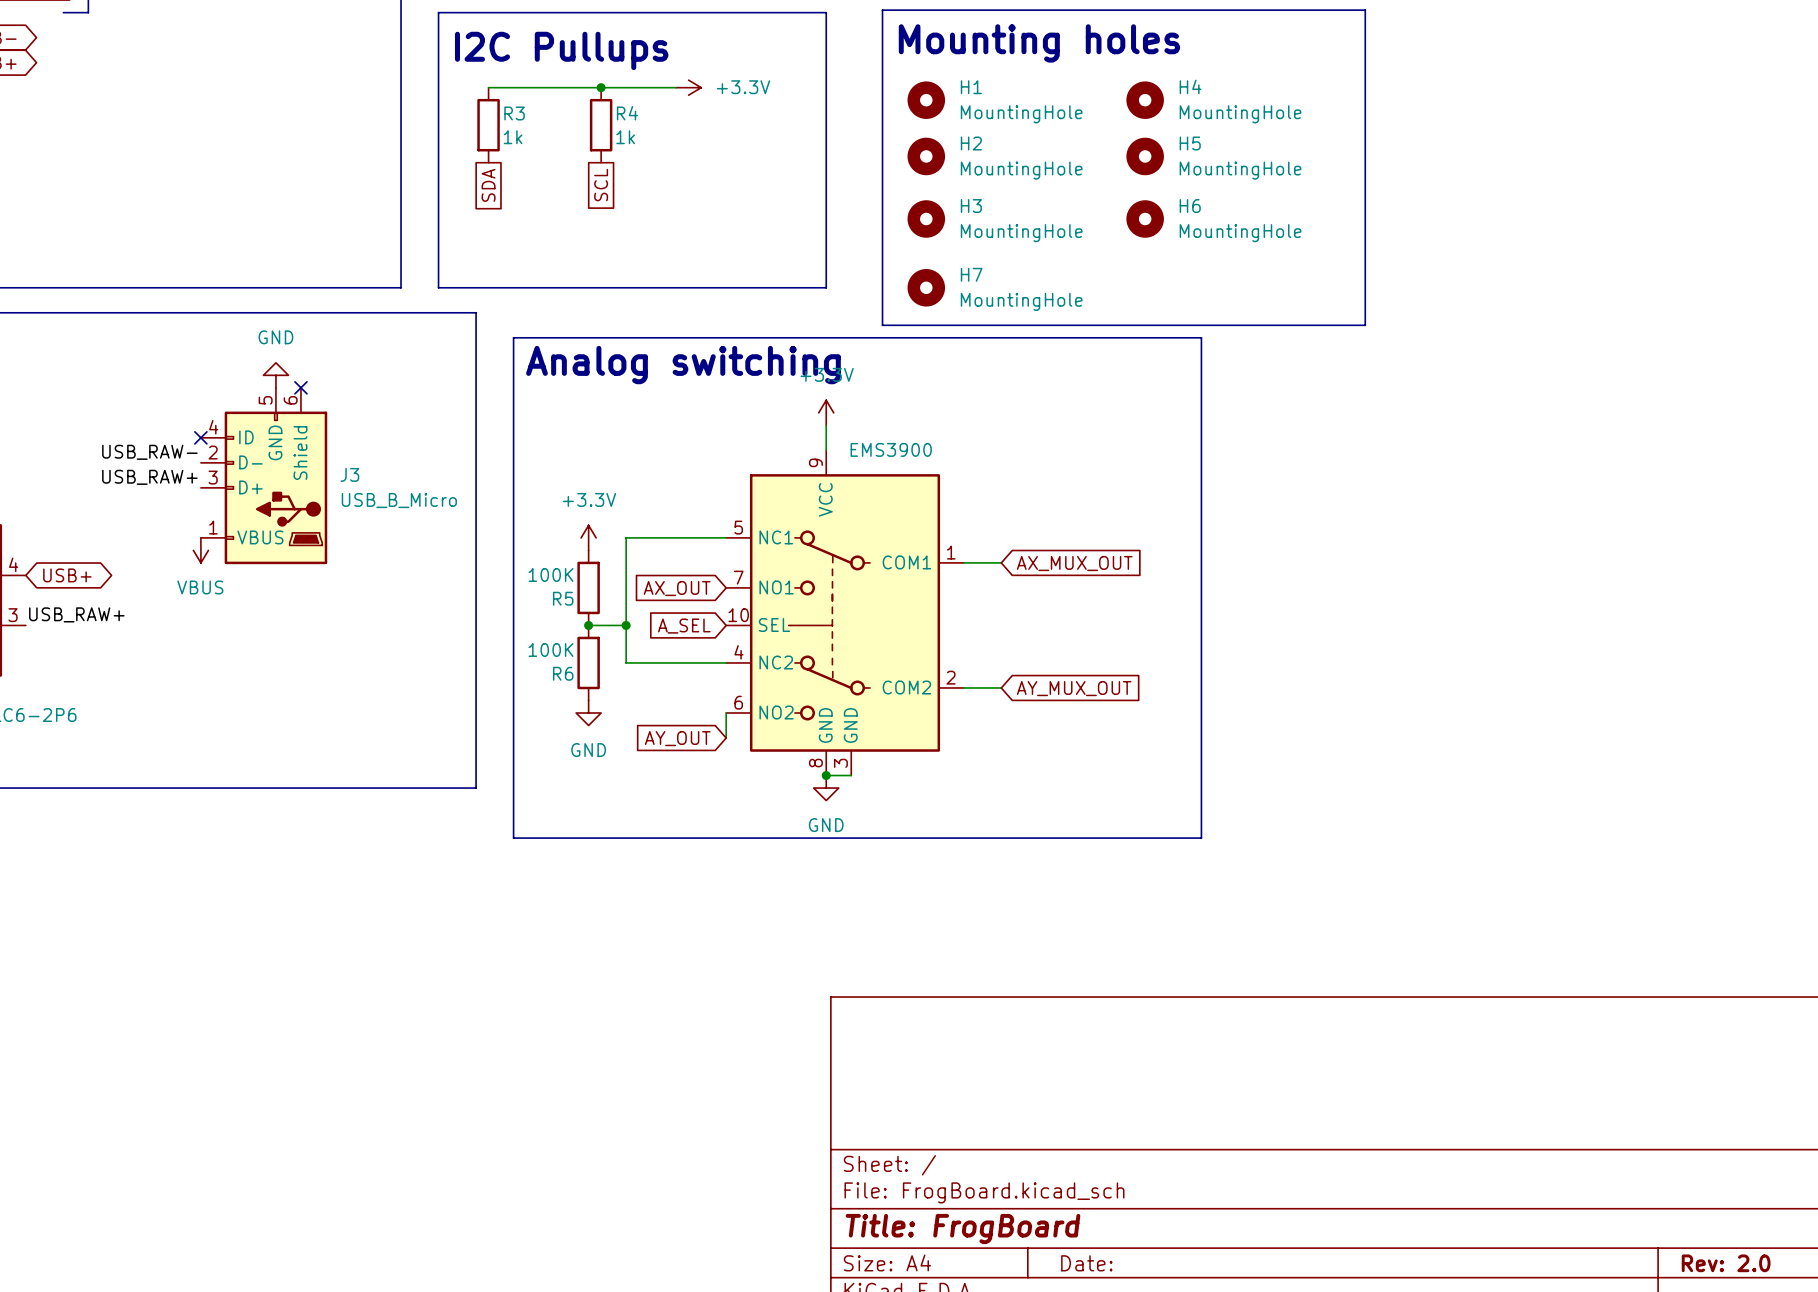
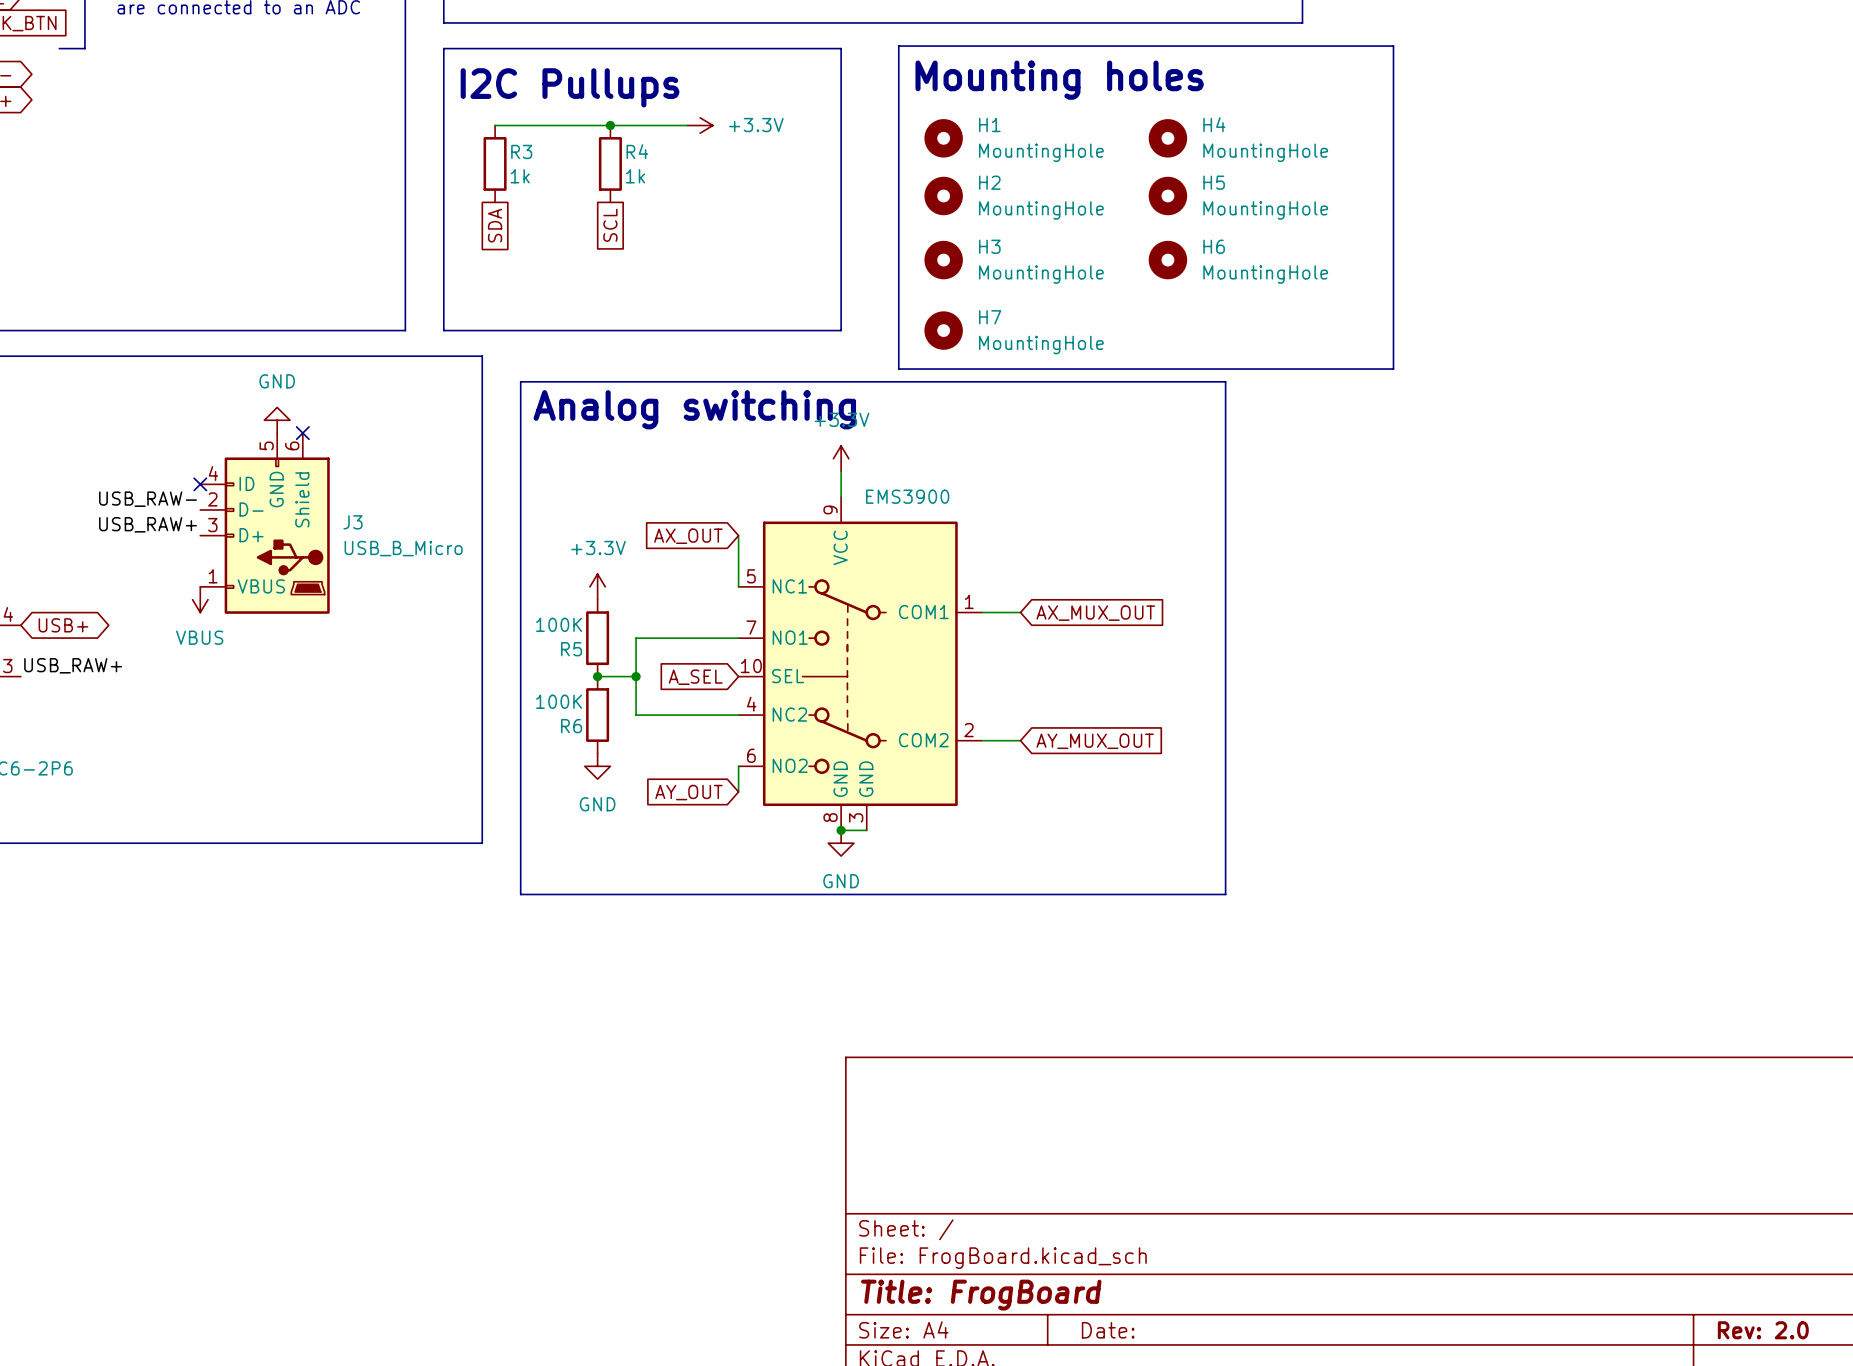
wire: none -> (738, 535) (738, 586)
wire: (726, 537) (626, 537) (626, 587) -> (738, 638) (636, 638)
global label position: AX_OUT (677, 588) -> AX_OUT (688, 536)

